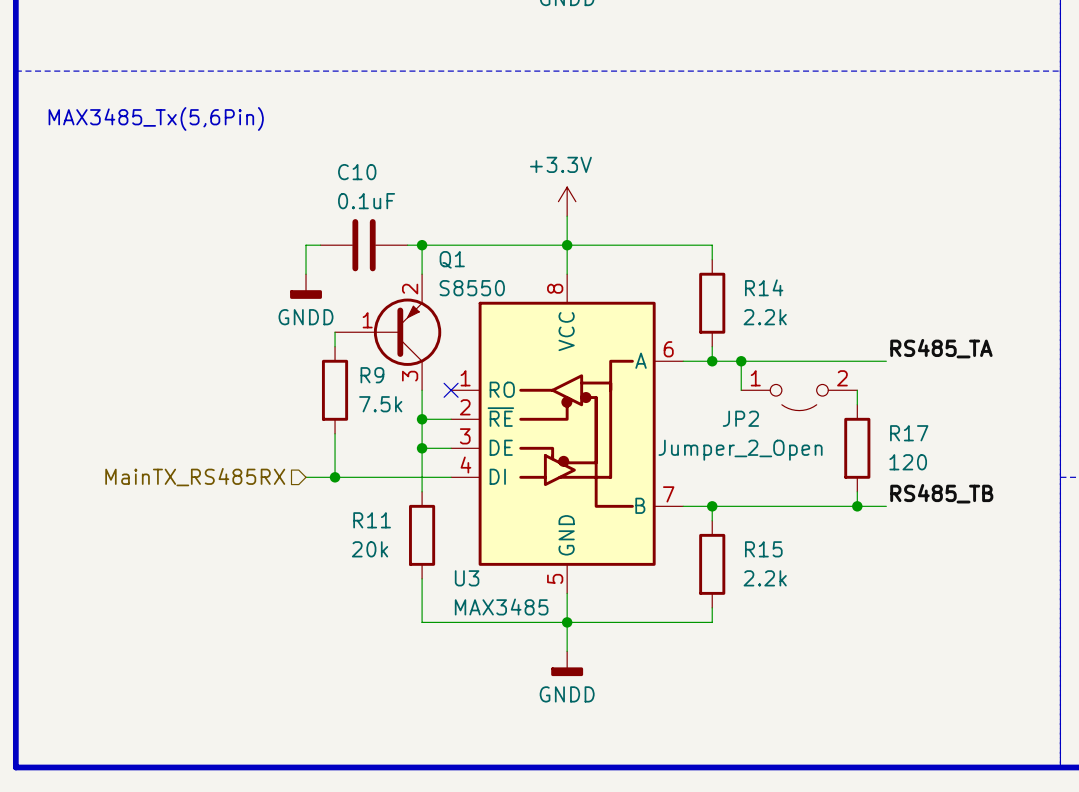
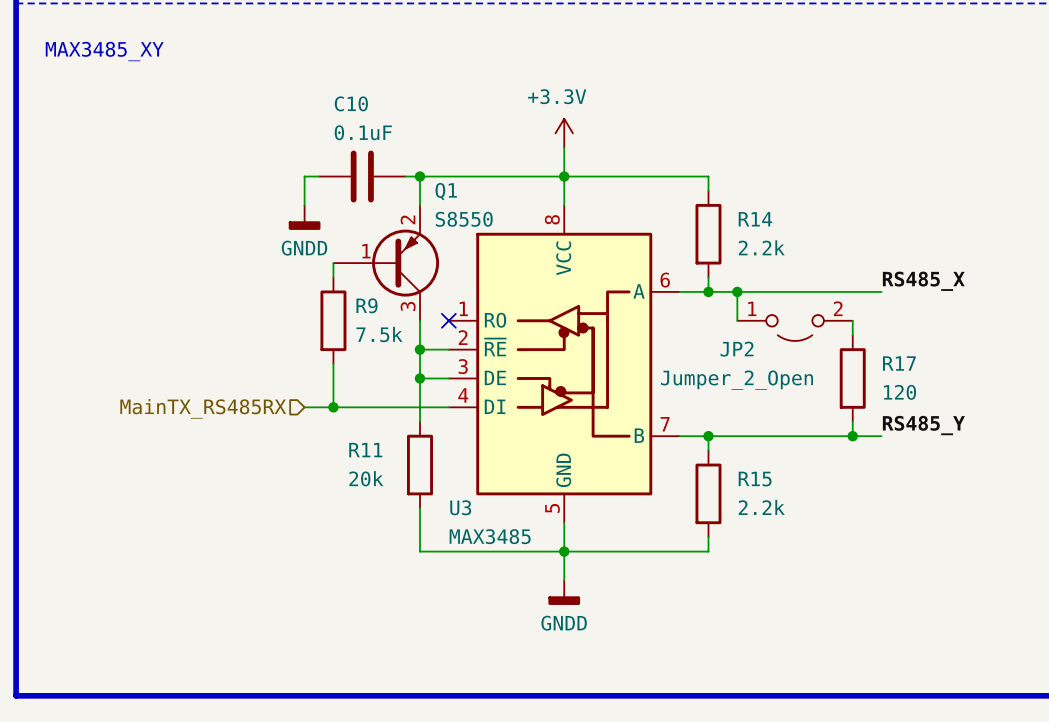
text: MAX3485_Tx(5,6Pin) (156, 118) -> MAX3485_XY (104, 51)
label: RS485_TA (941, 348) -> RS485_X (923, 281)
label: RS485_TB (941, 493) -> RS485_Y (923, 425)

